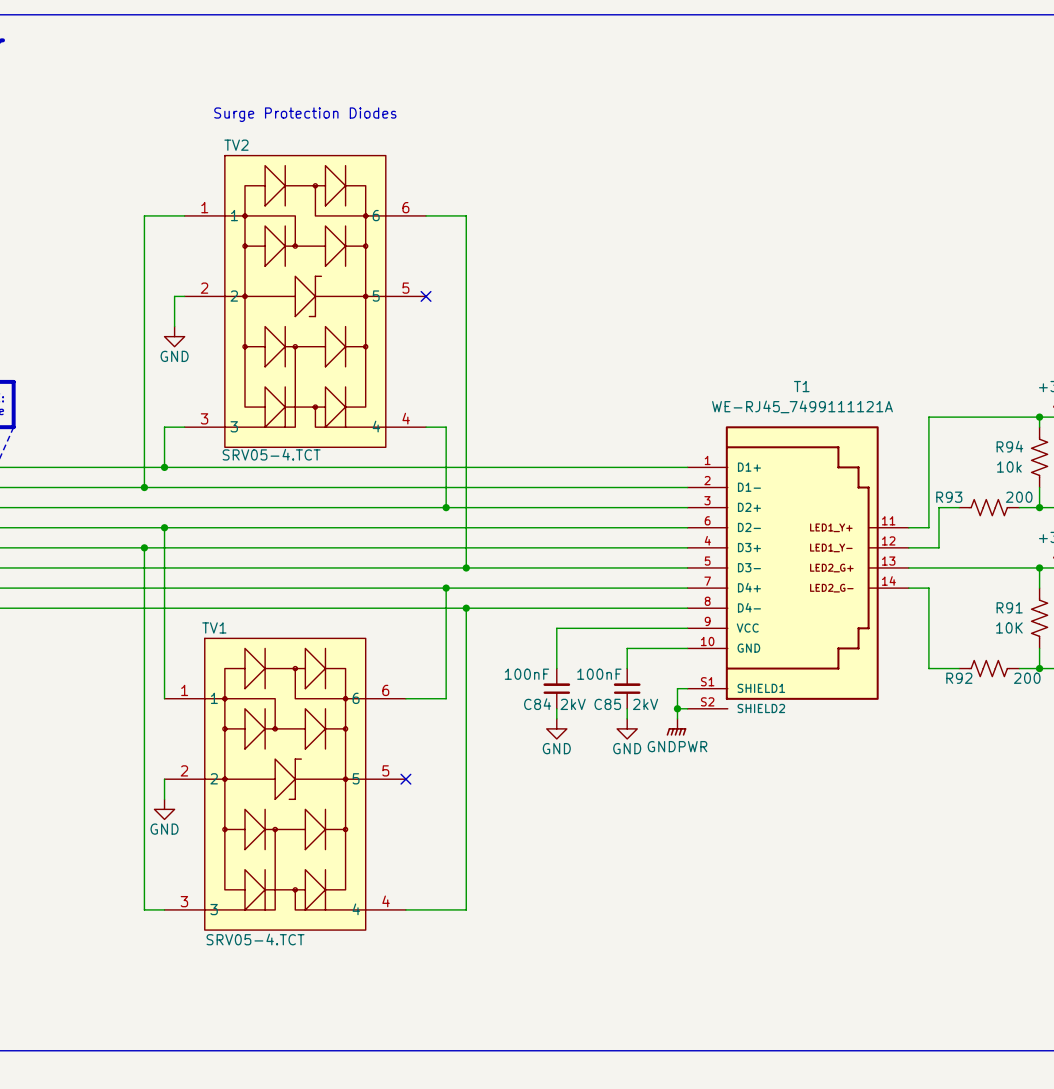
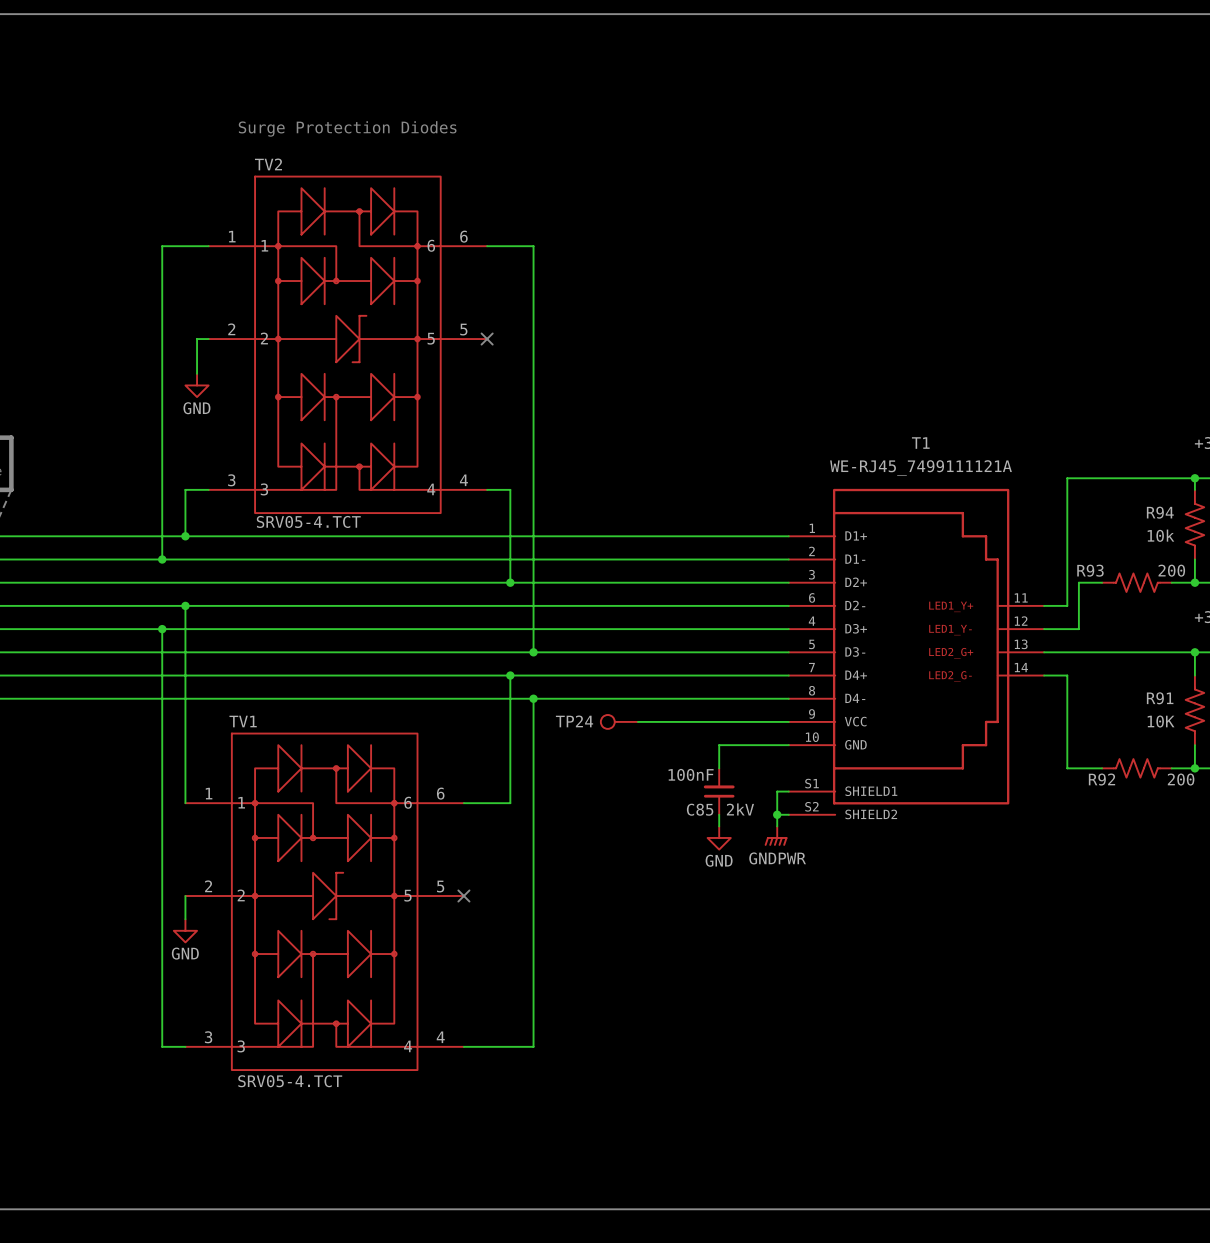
TP24: none -> (619, 721)
wire: (556, 628) (556, 668) -> none
C84: 100nF (556, 688) -> none
wire: (556, 708) (556, 718) -> none
power symbol: GND (556, 728) -> none

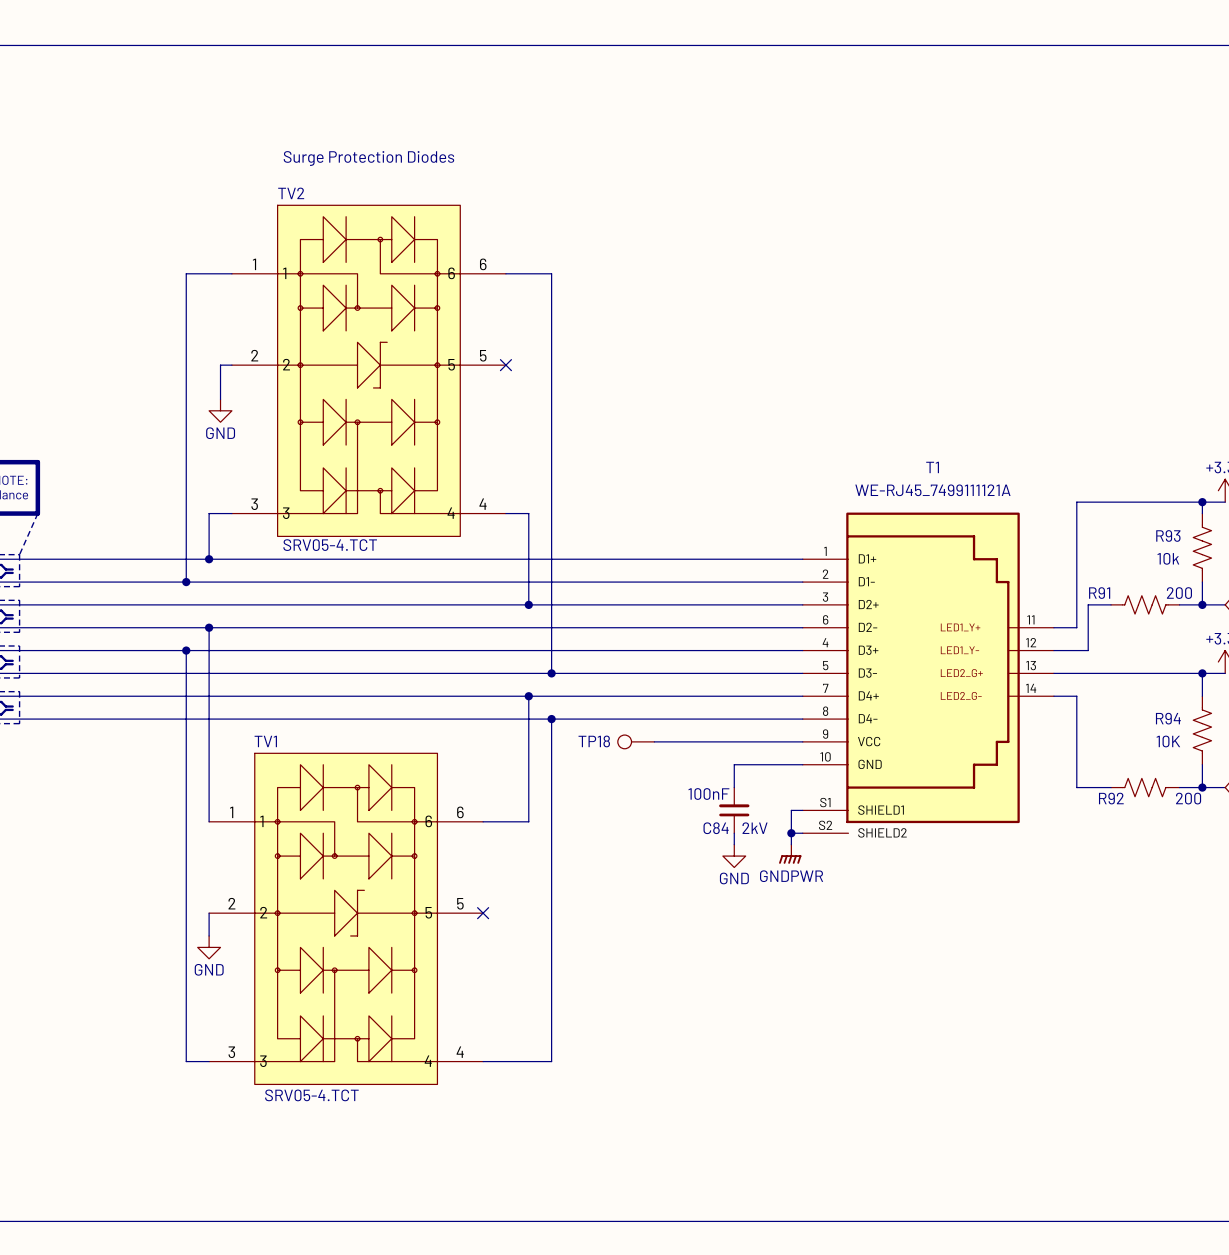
R94 name: R94 (1160, 512) -> R93 (1168, 535)
R93 name: R93 (1090, 570) -> R91 (1099, 593)
R91 name: R91 (1160, 698) -> R94 (1168, 718)
TP24 name: TP24 (574, 721) -> TP18 (594, 741)
C85 name: C85 (700, 809) -> C84 (716, 828)

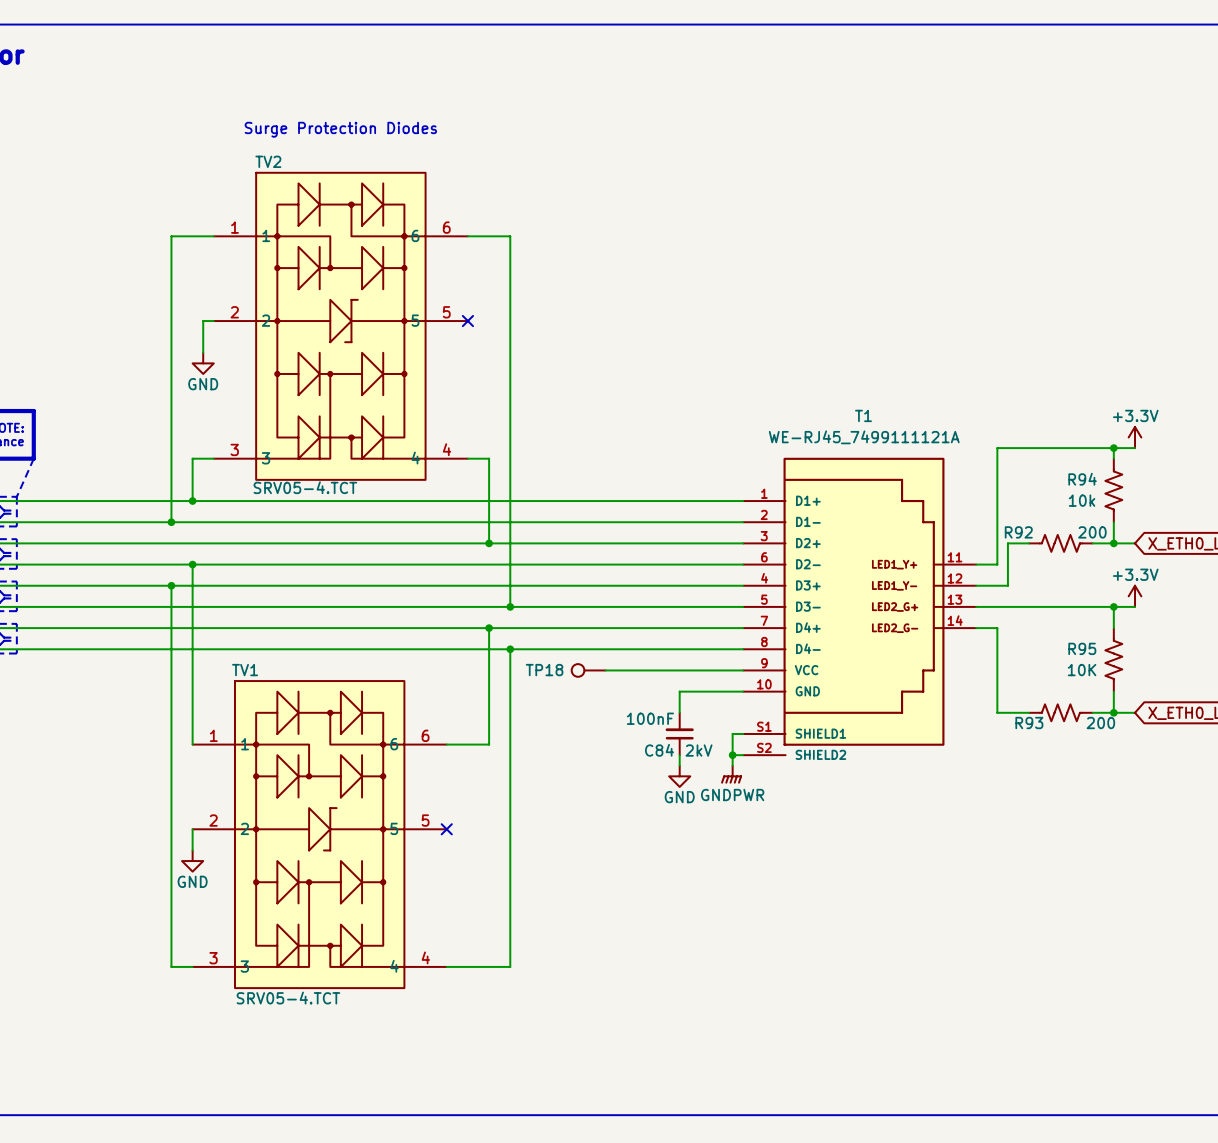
R93 name: R93 (1168, 535) -> R94 (1082, 479)
R91 name: R91 (1099, 593) -> R92 (1018, 532)
R94 name: R94 (1168, 718) -> R95 (1082, 648)
R92 name: R92 (1111, 798) -> R93 (1029, 723)

